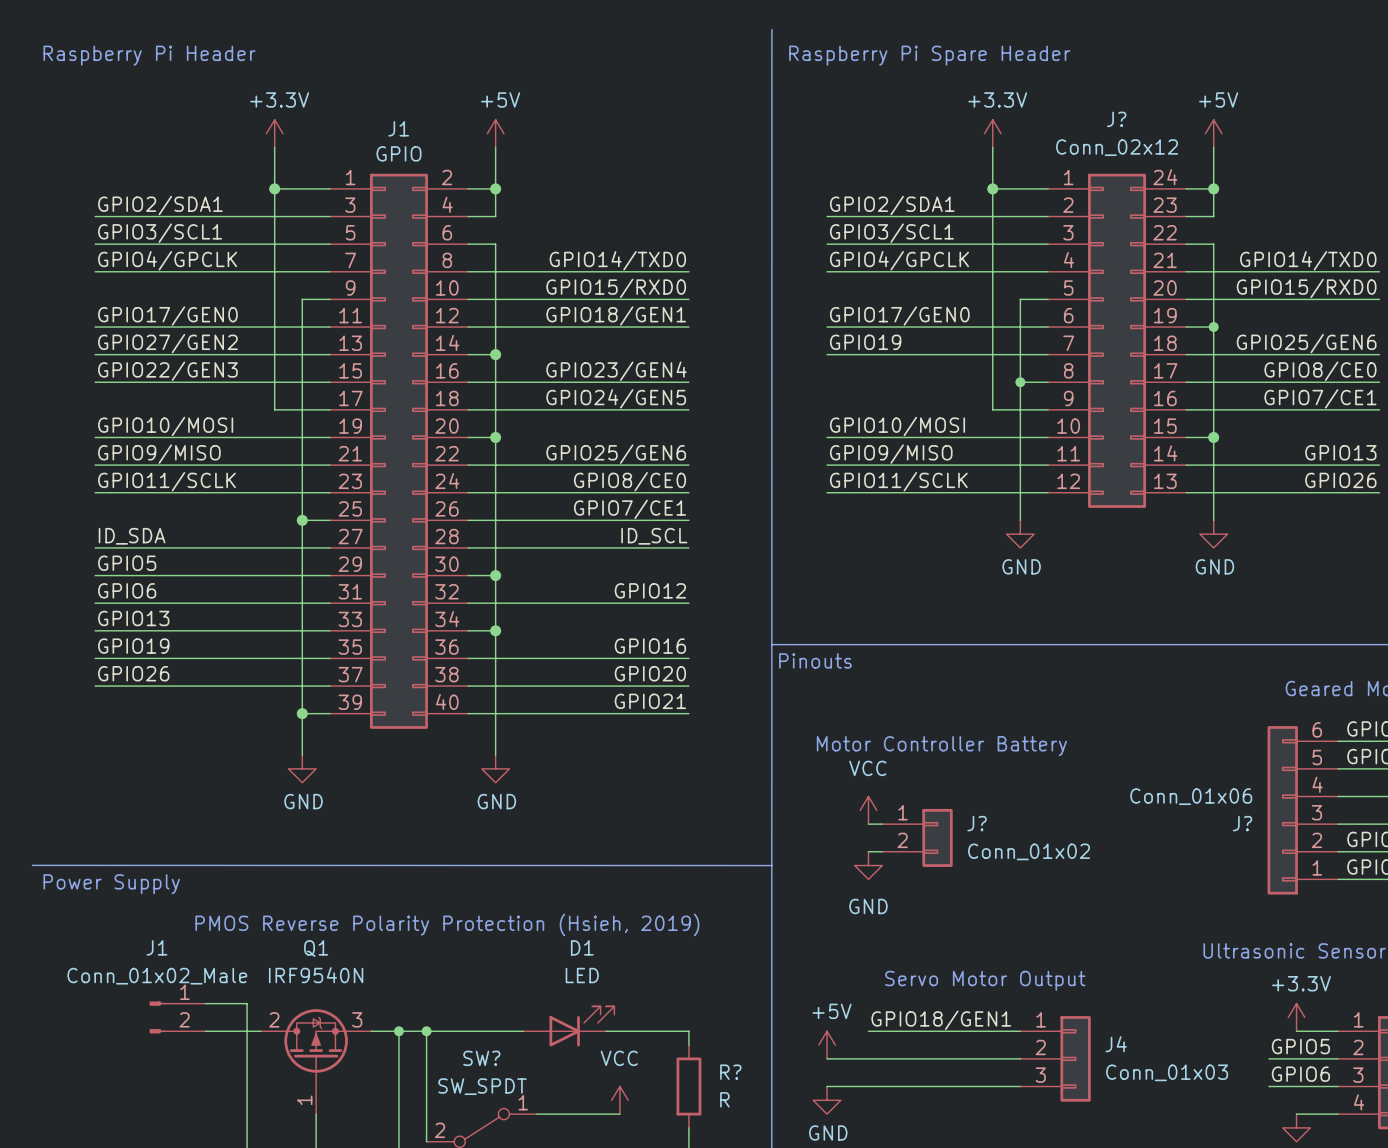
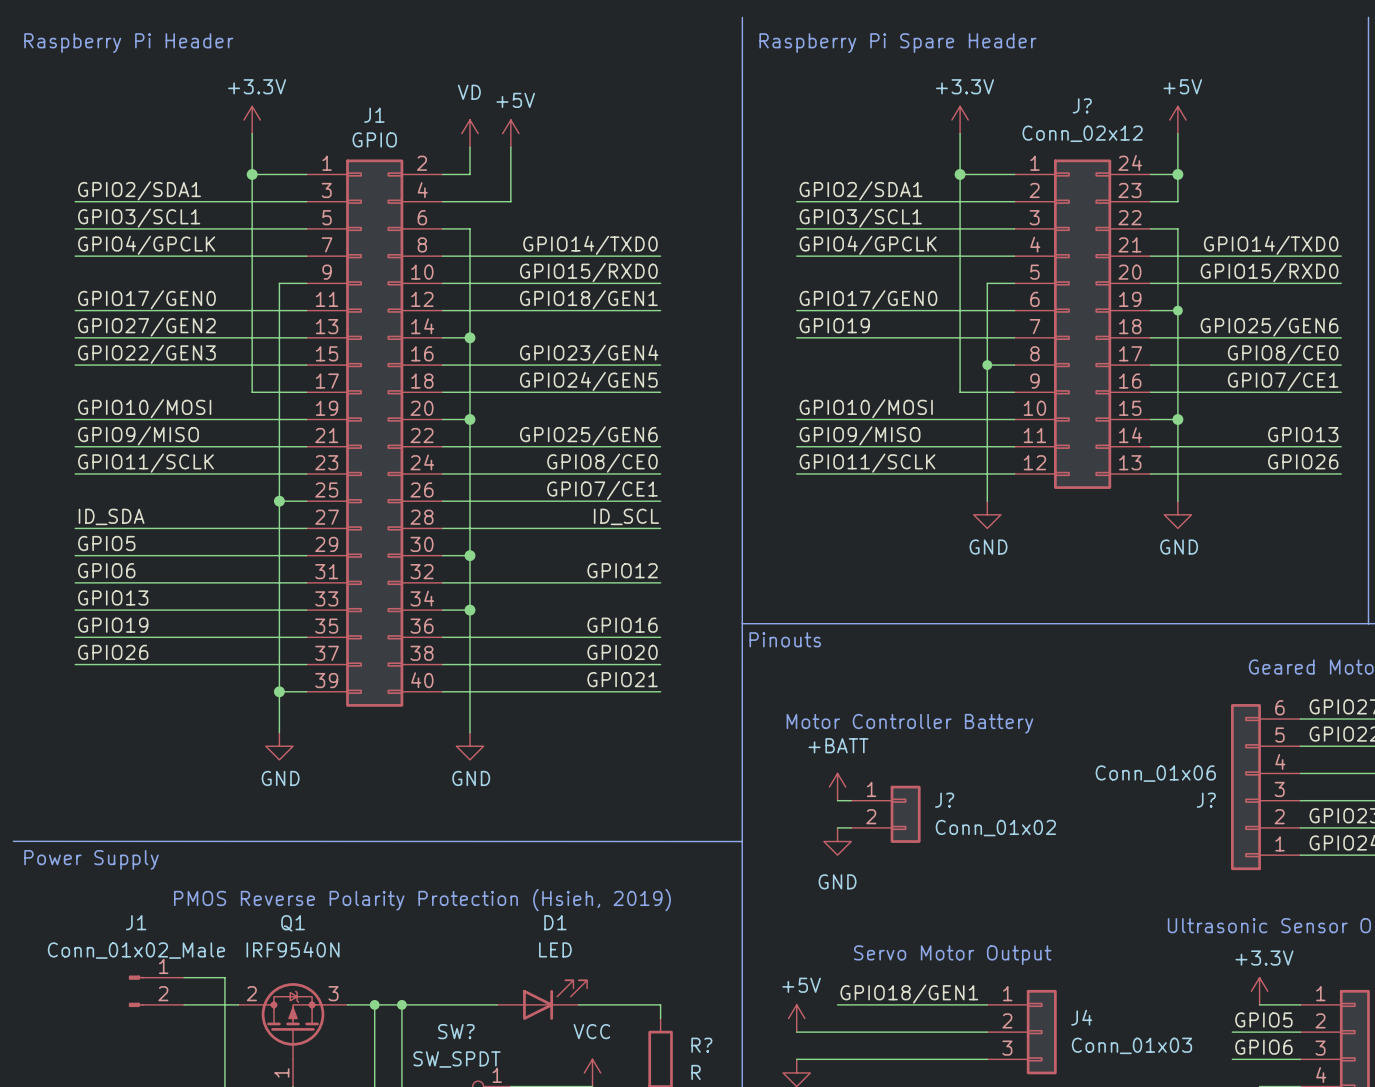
power symbol position: +5V (495, 133) -> +5V (510, 133)
power symbol: none -> VD (469, 133)
wire: (495, 188) (495, 216) -> (510, 147) (510, 201) (469, 201)
junction: (495, 188) -> none
power symbol: VCC (868, 810) -> +BATT (837, 787)

